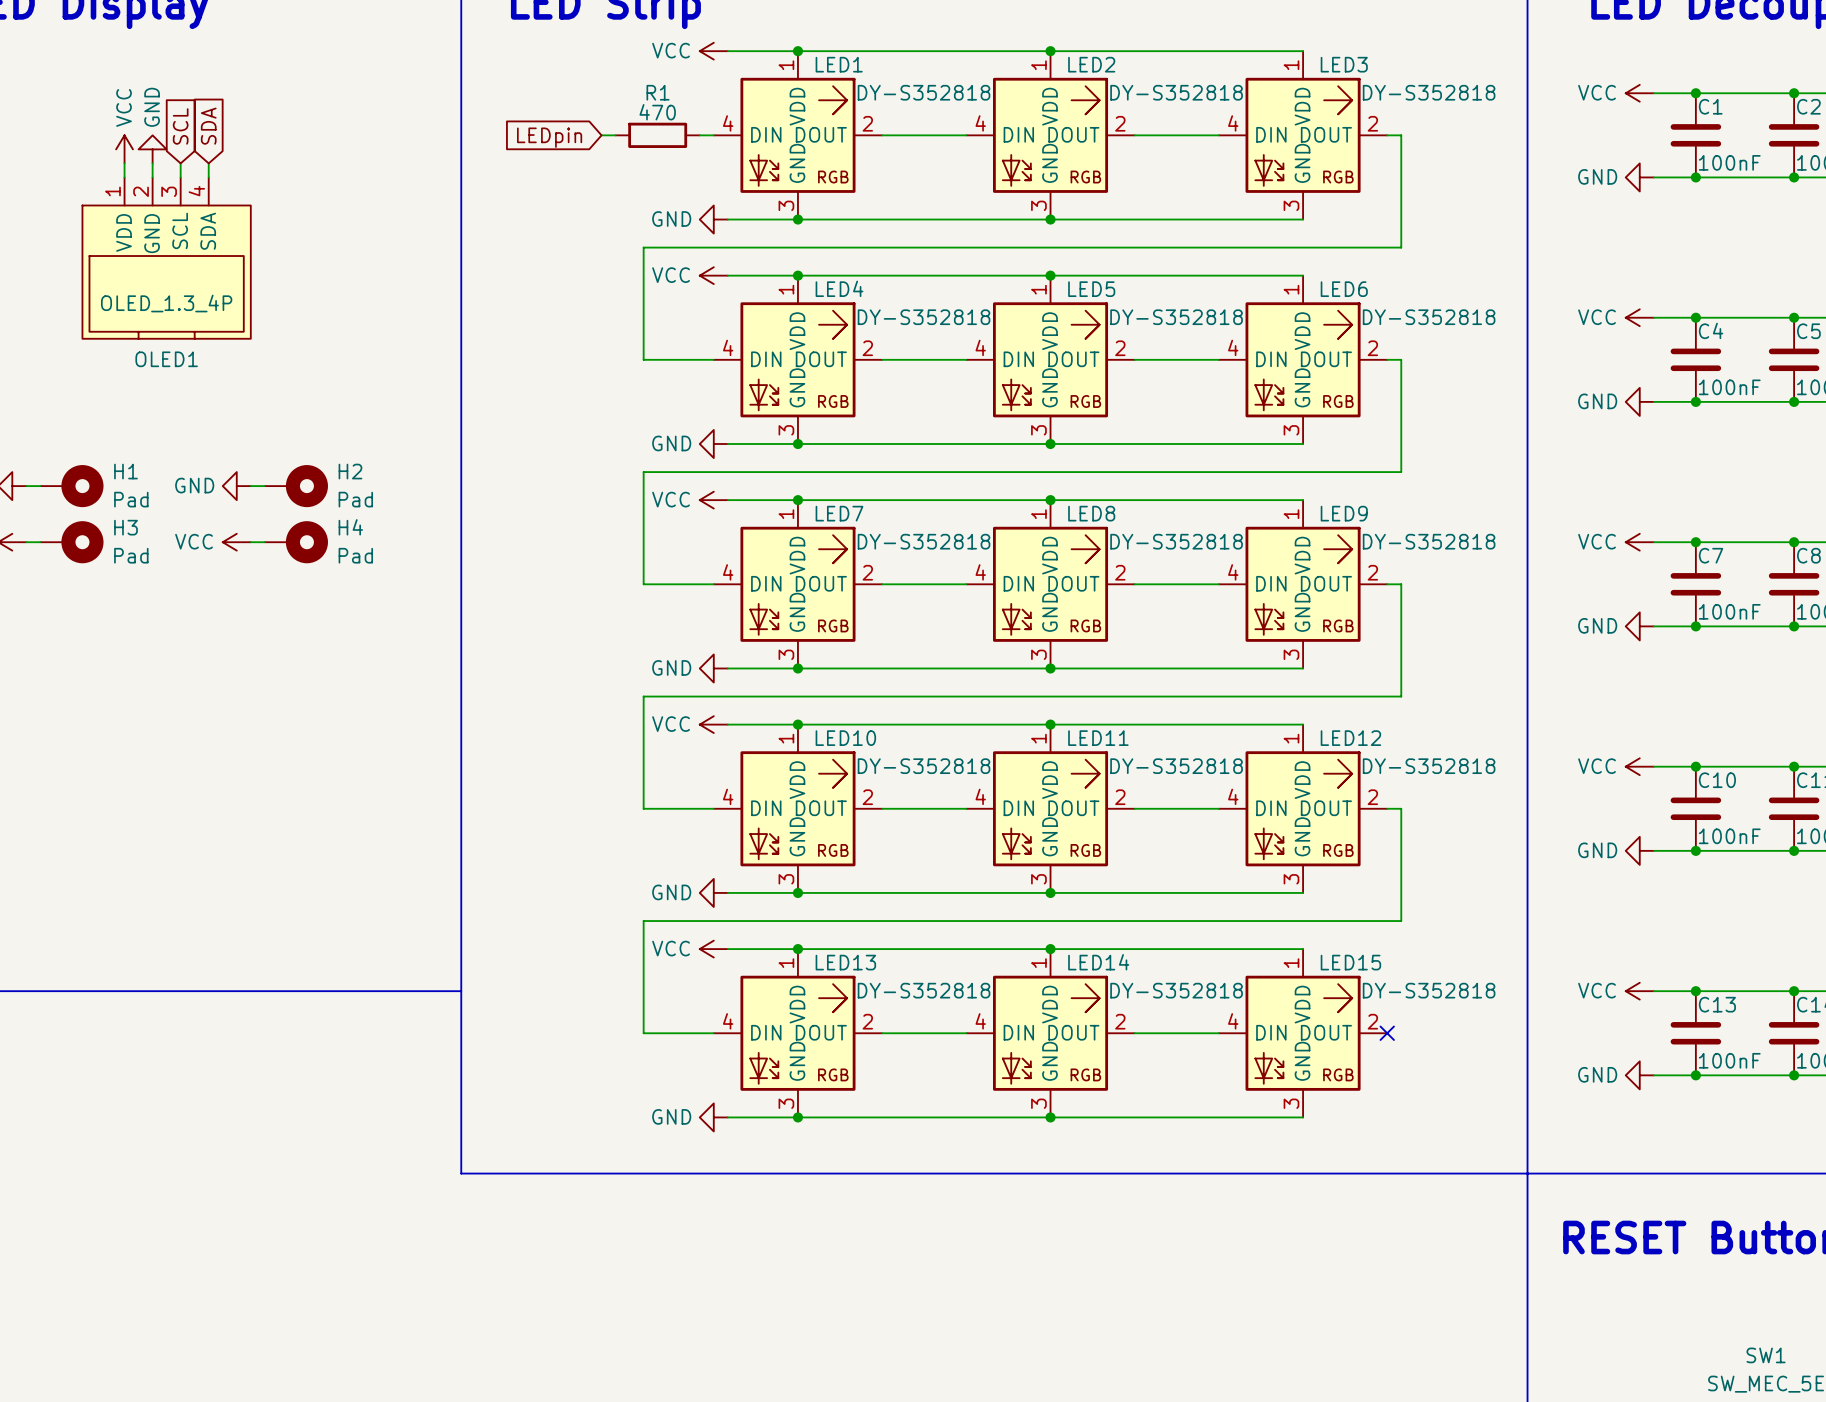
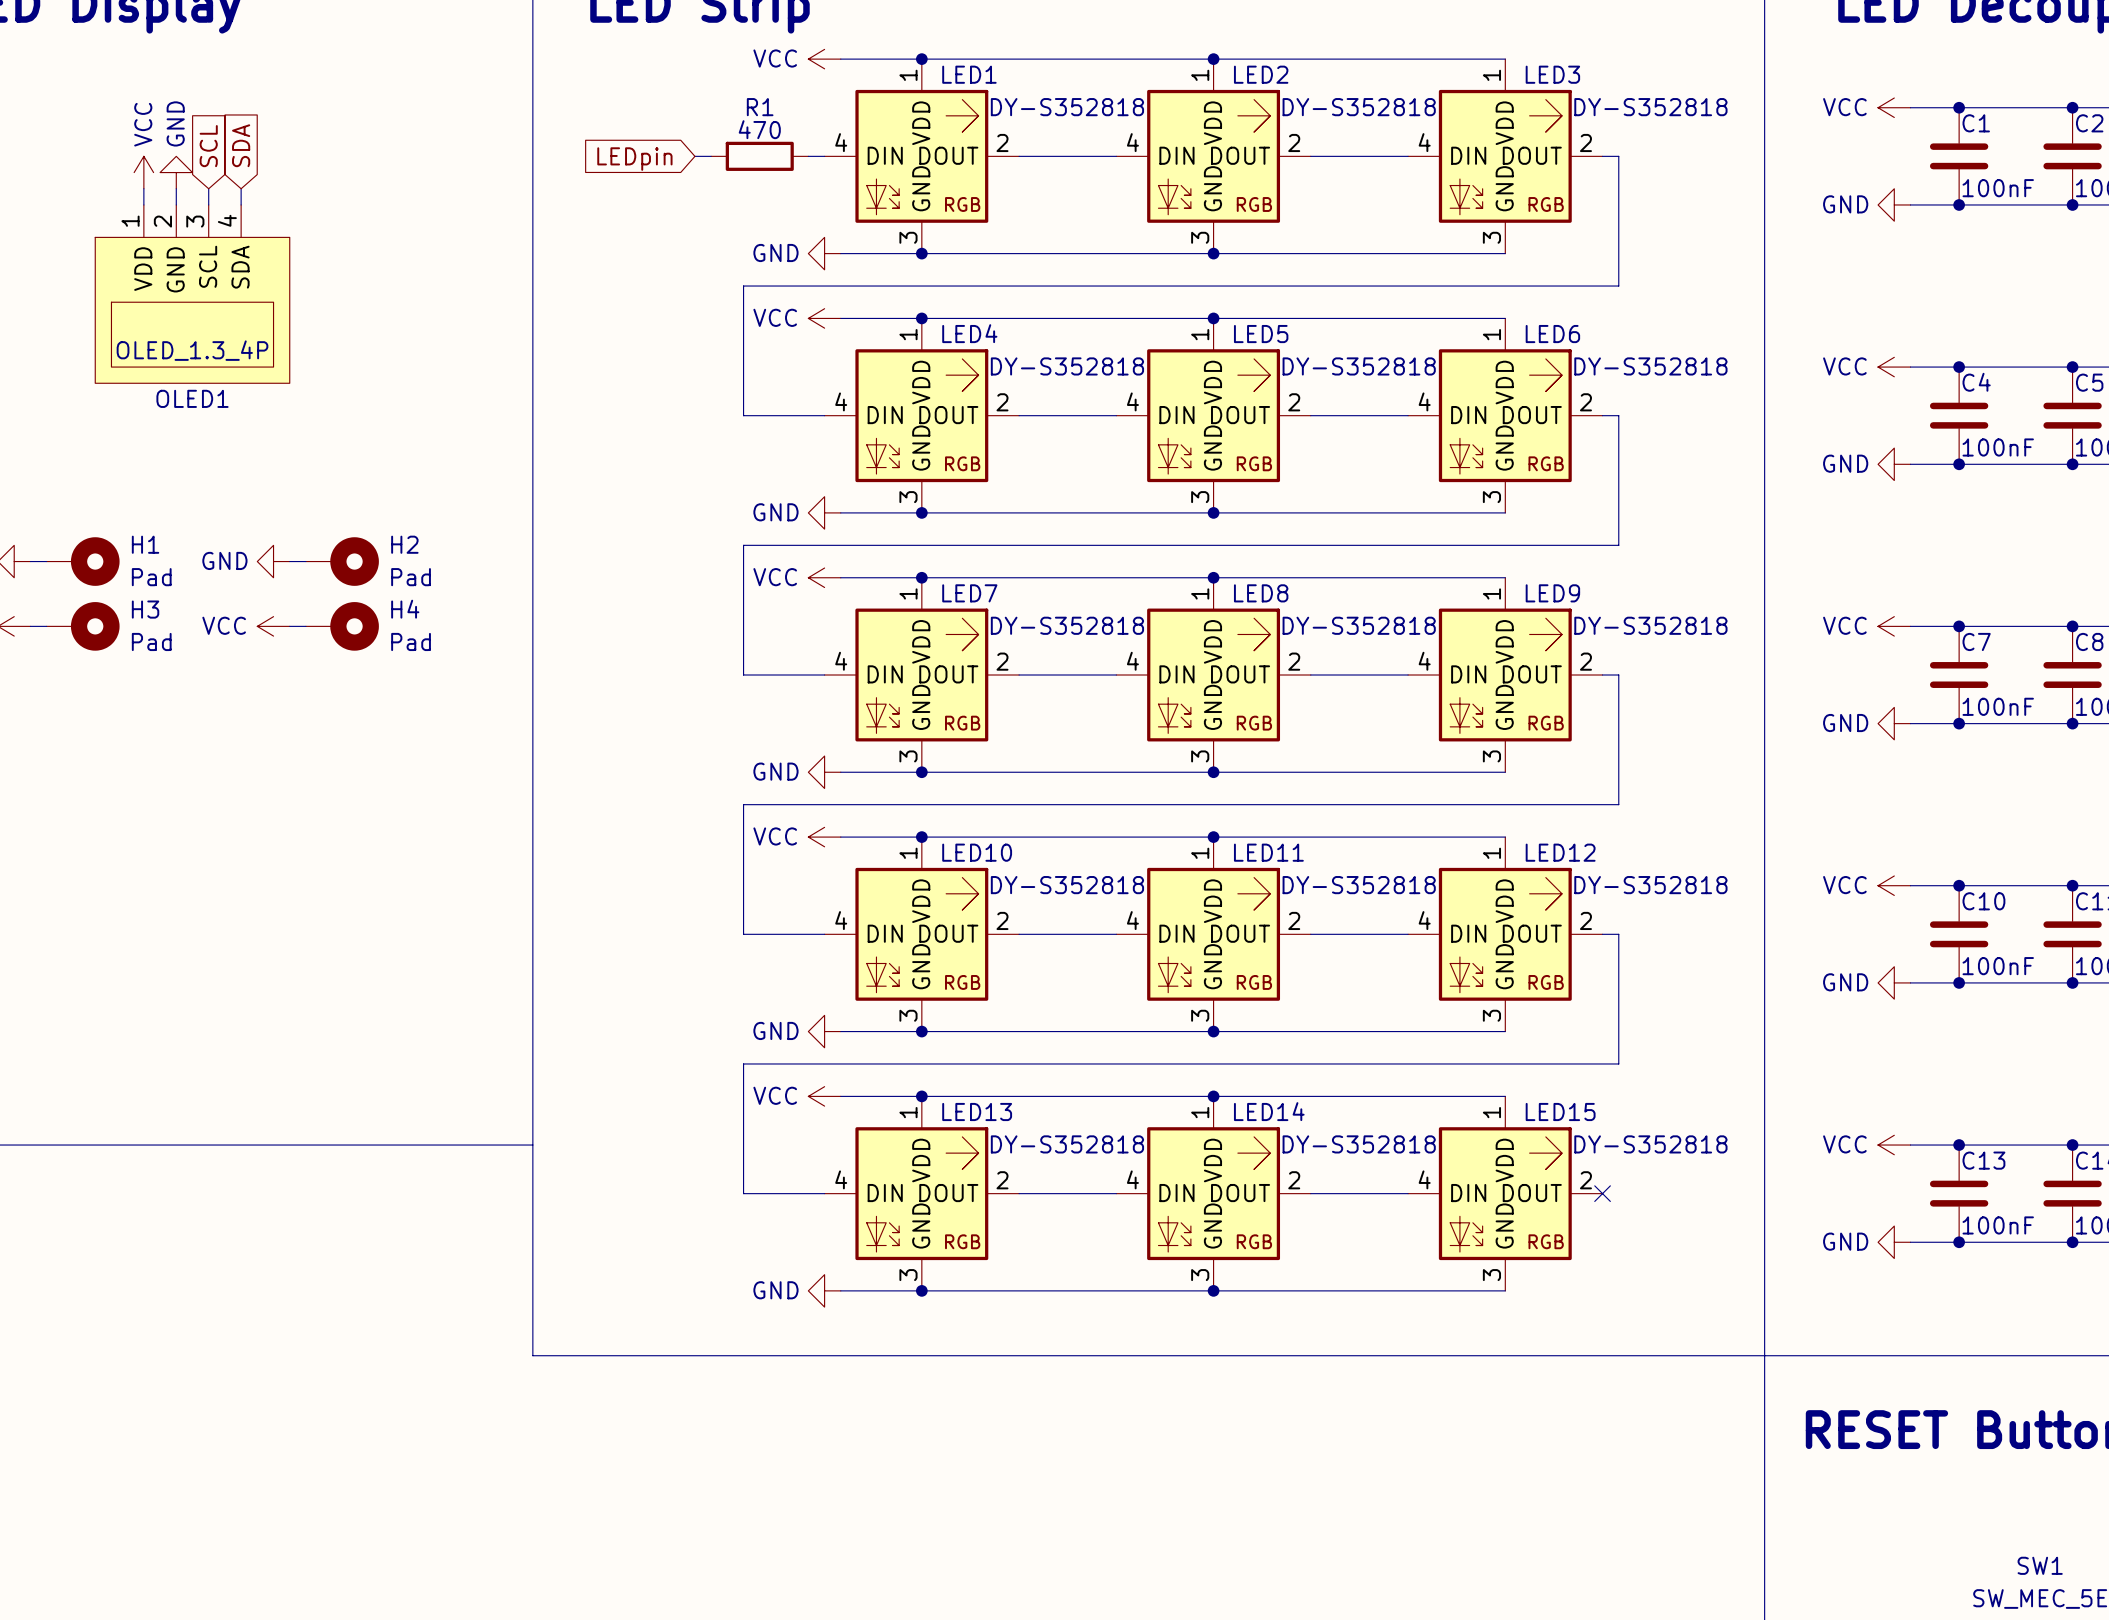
OLED1 symbol: [82, 177, 251, 339] -> [95, 204, 290, 384]

